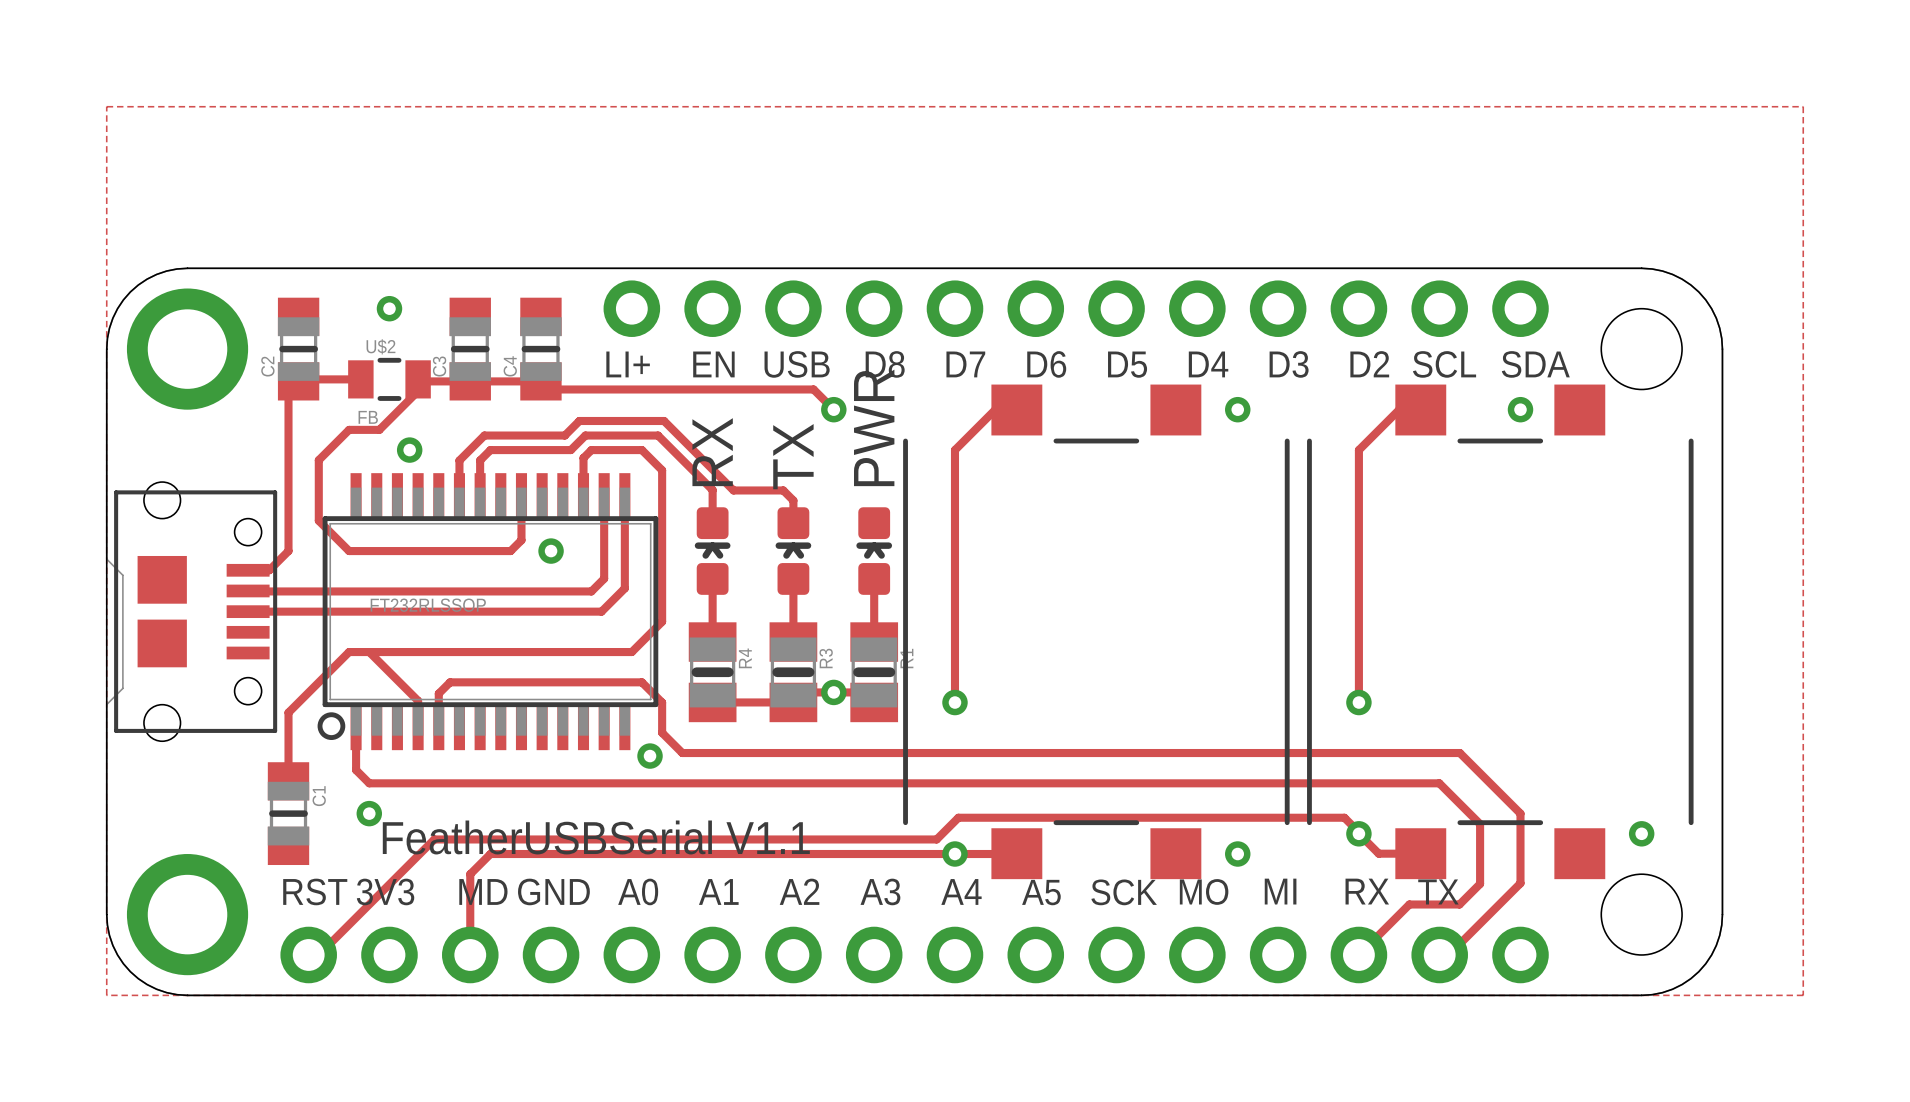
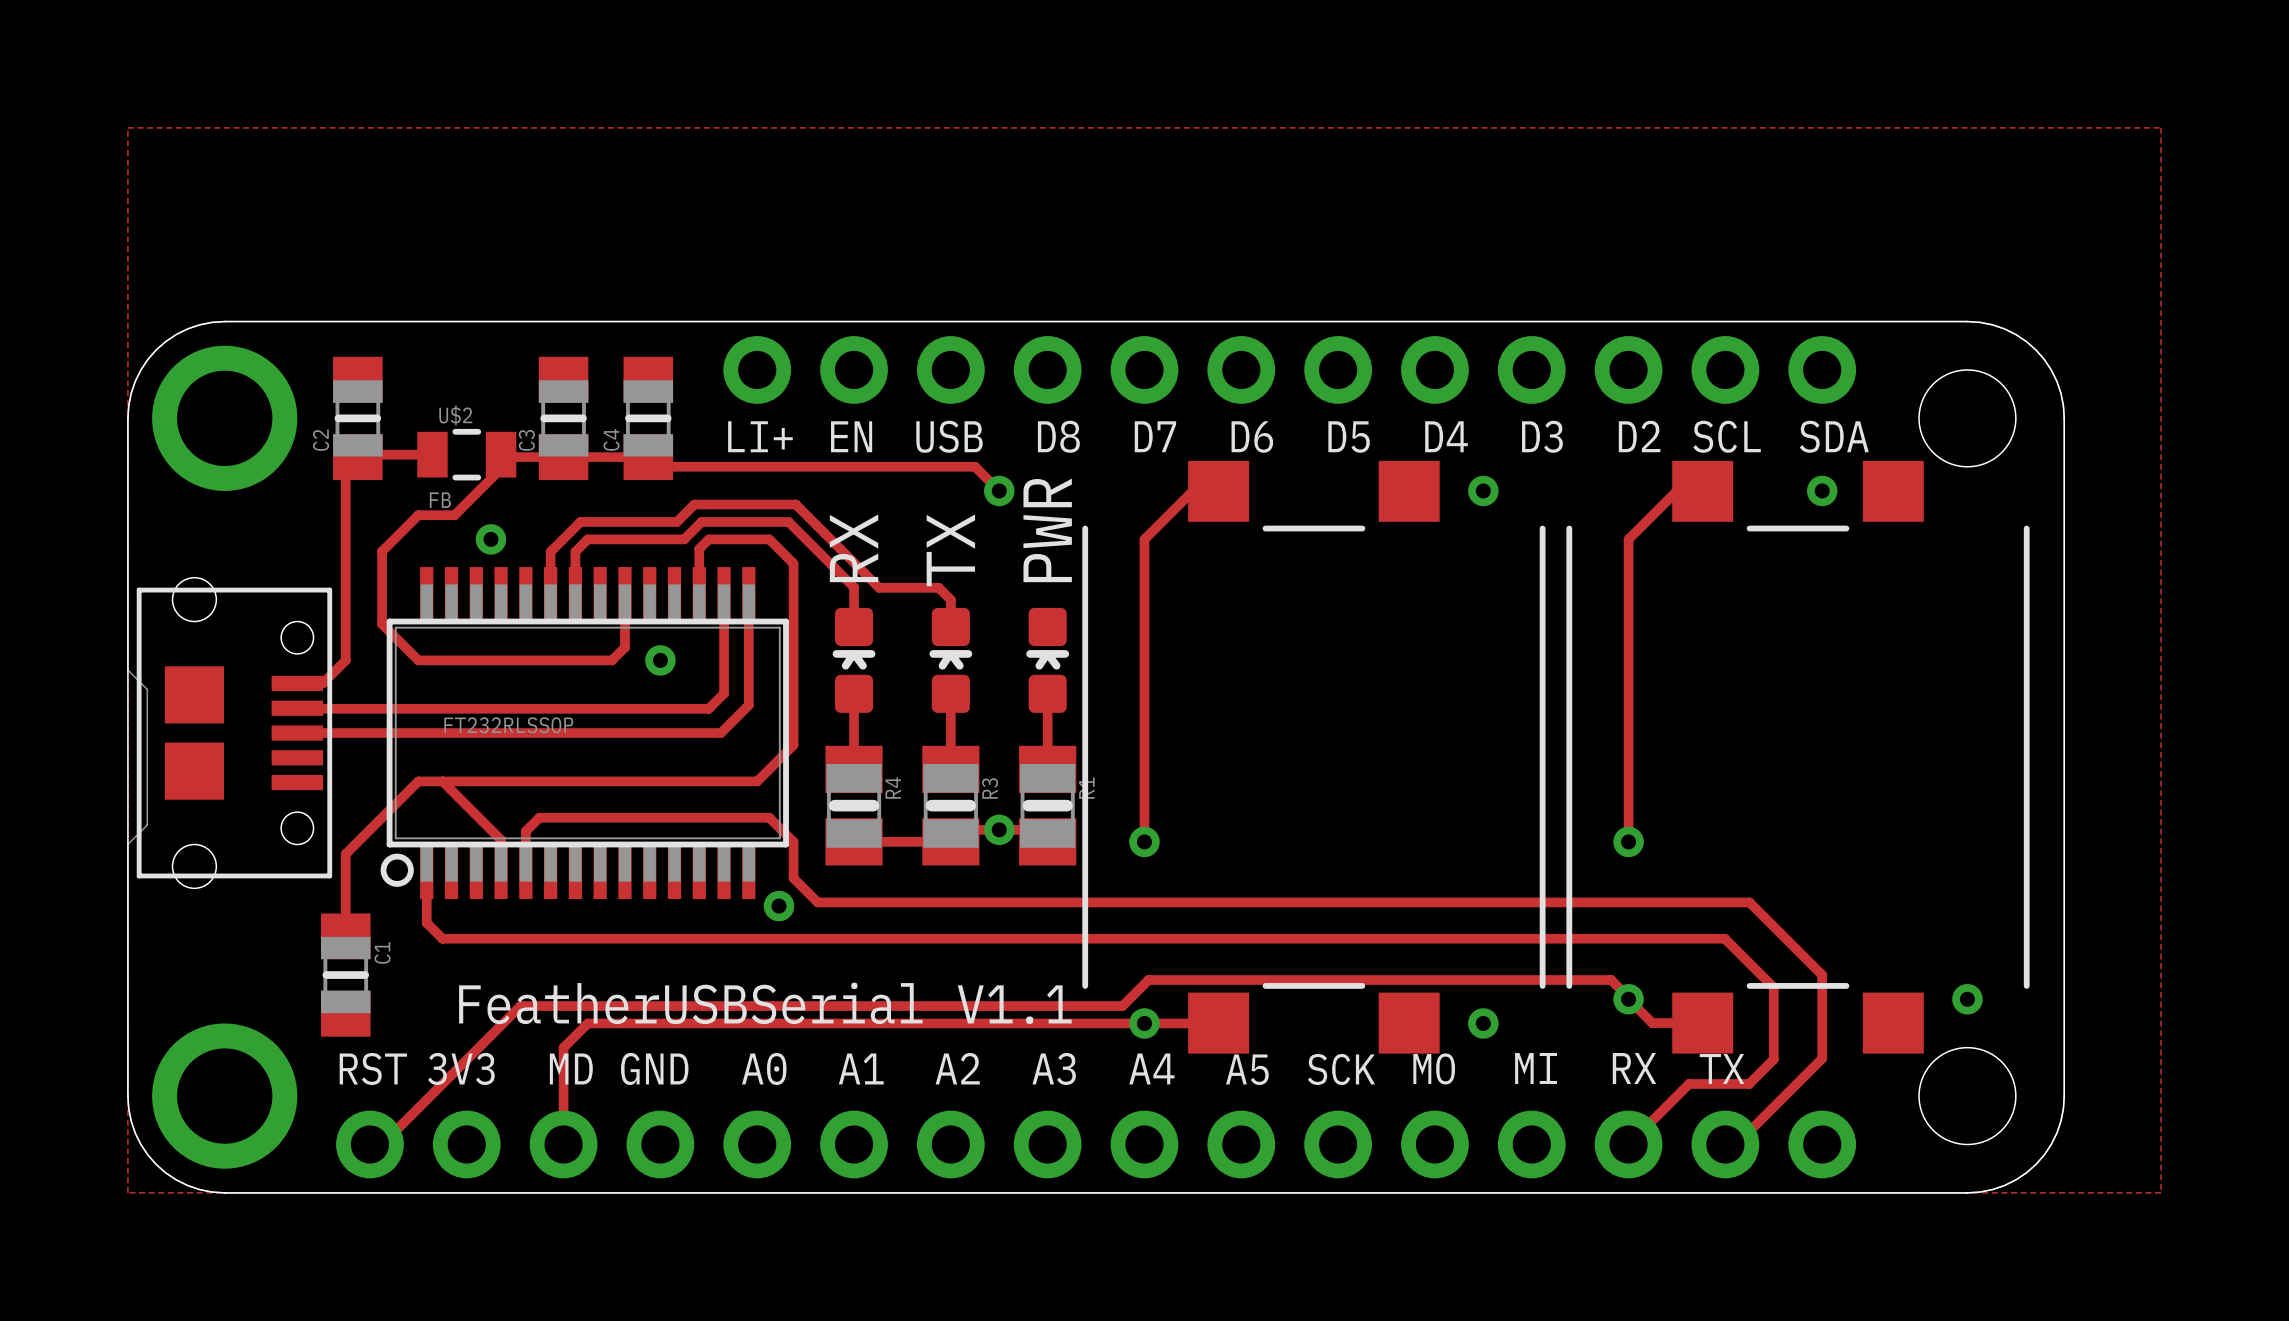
via: (389, 308) -> none
via: (369, 813) -> none

